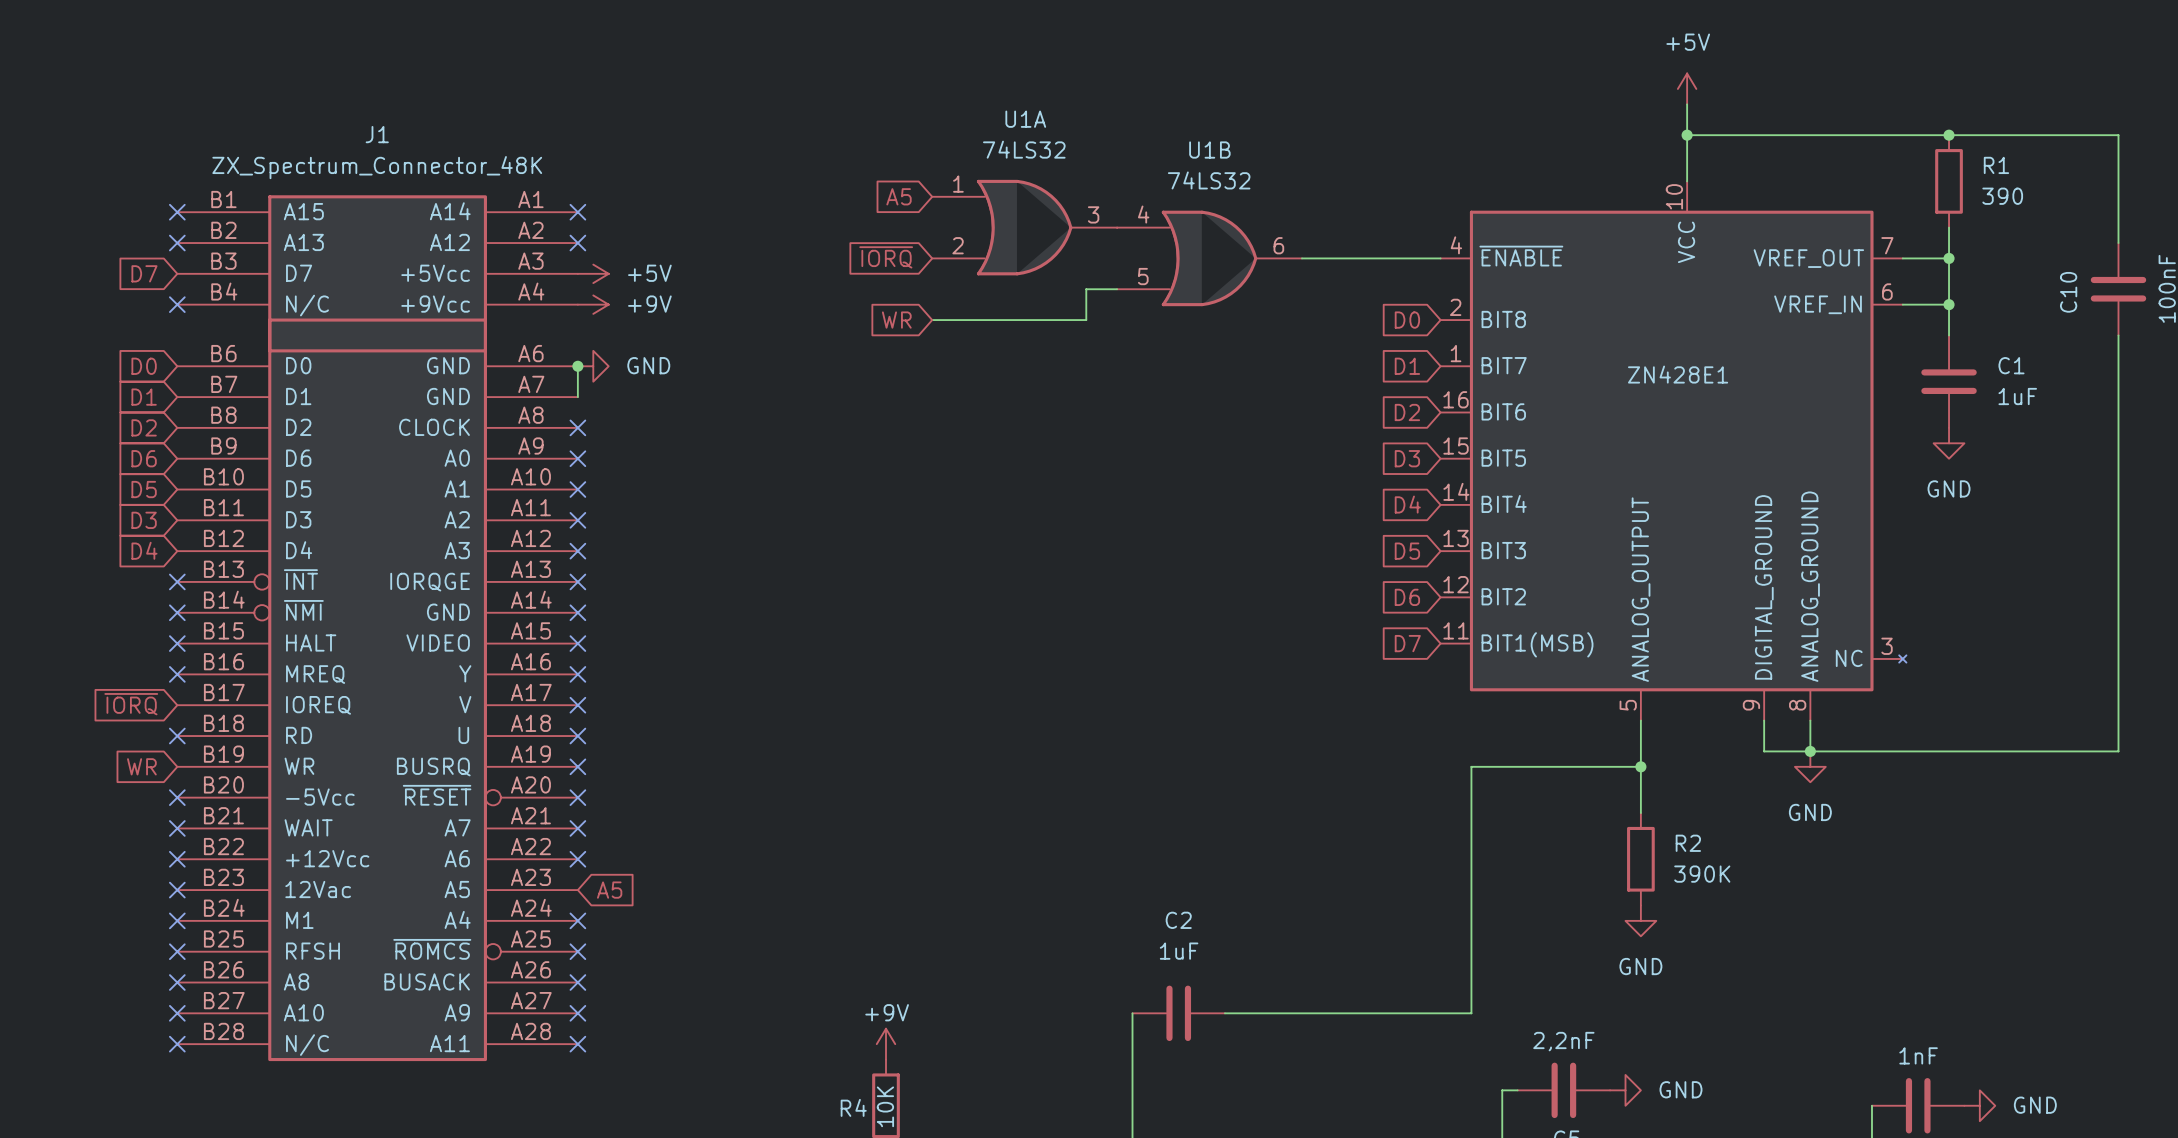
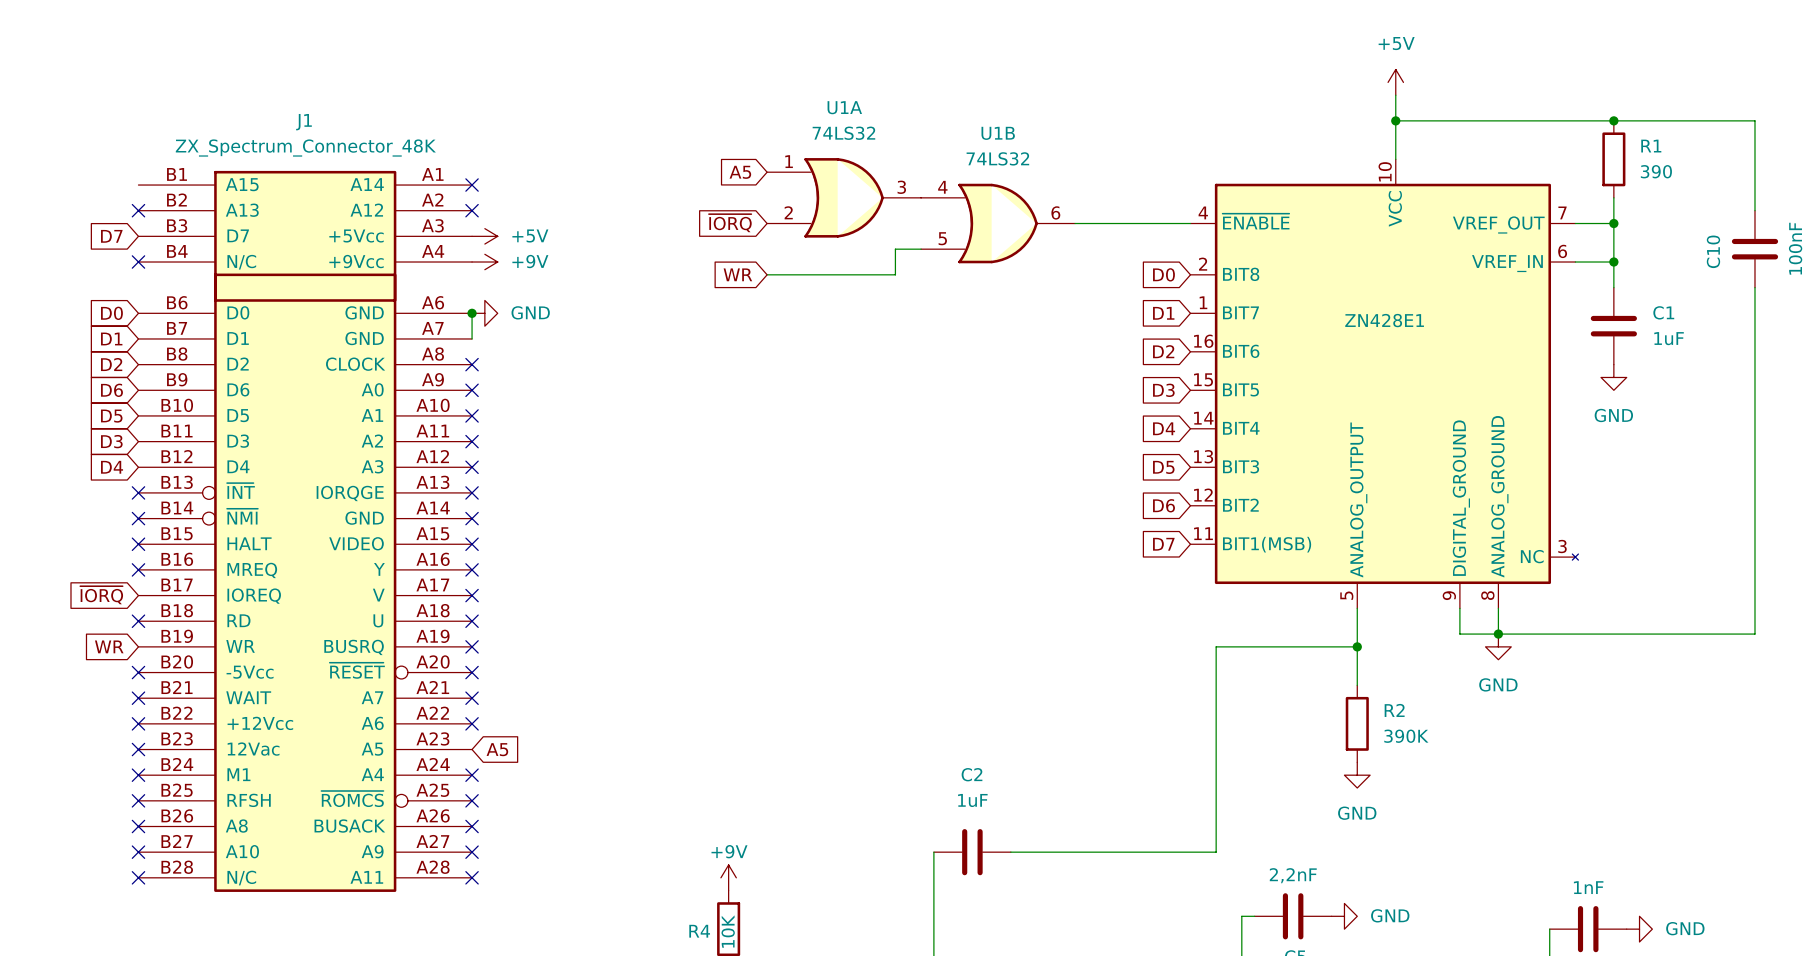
no-connect mark: (177, 212) -> none

